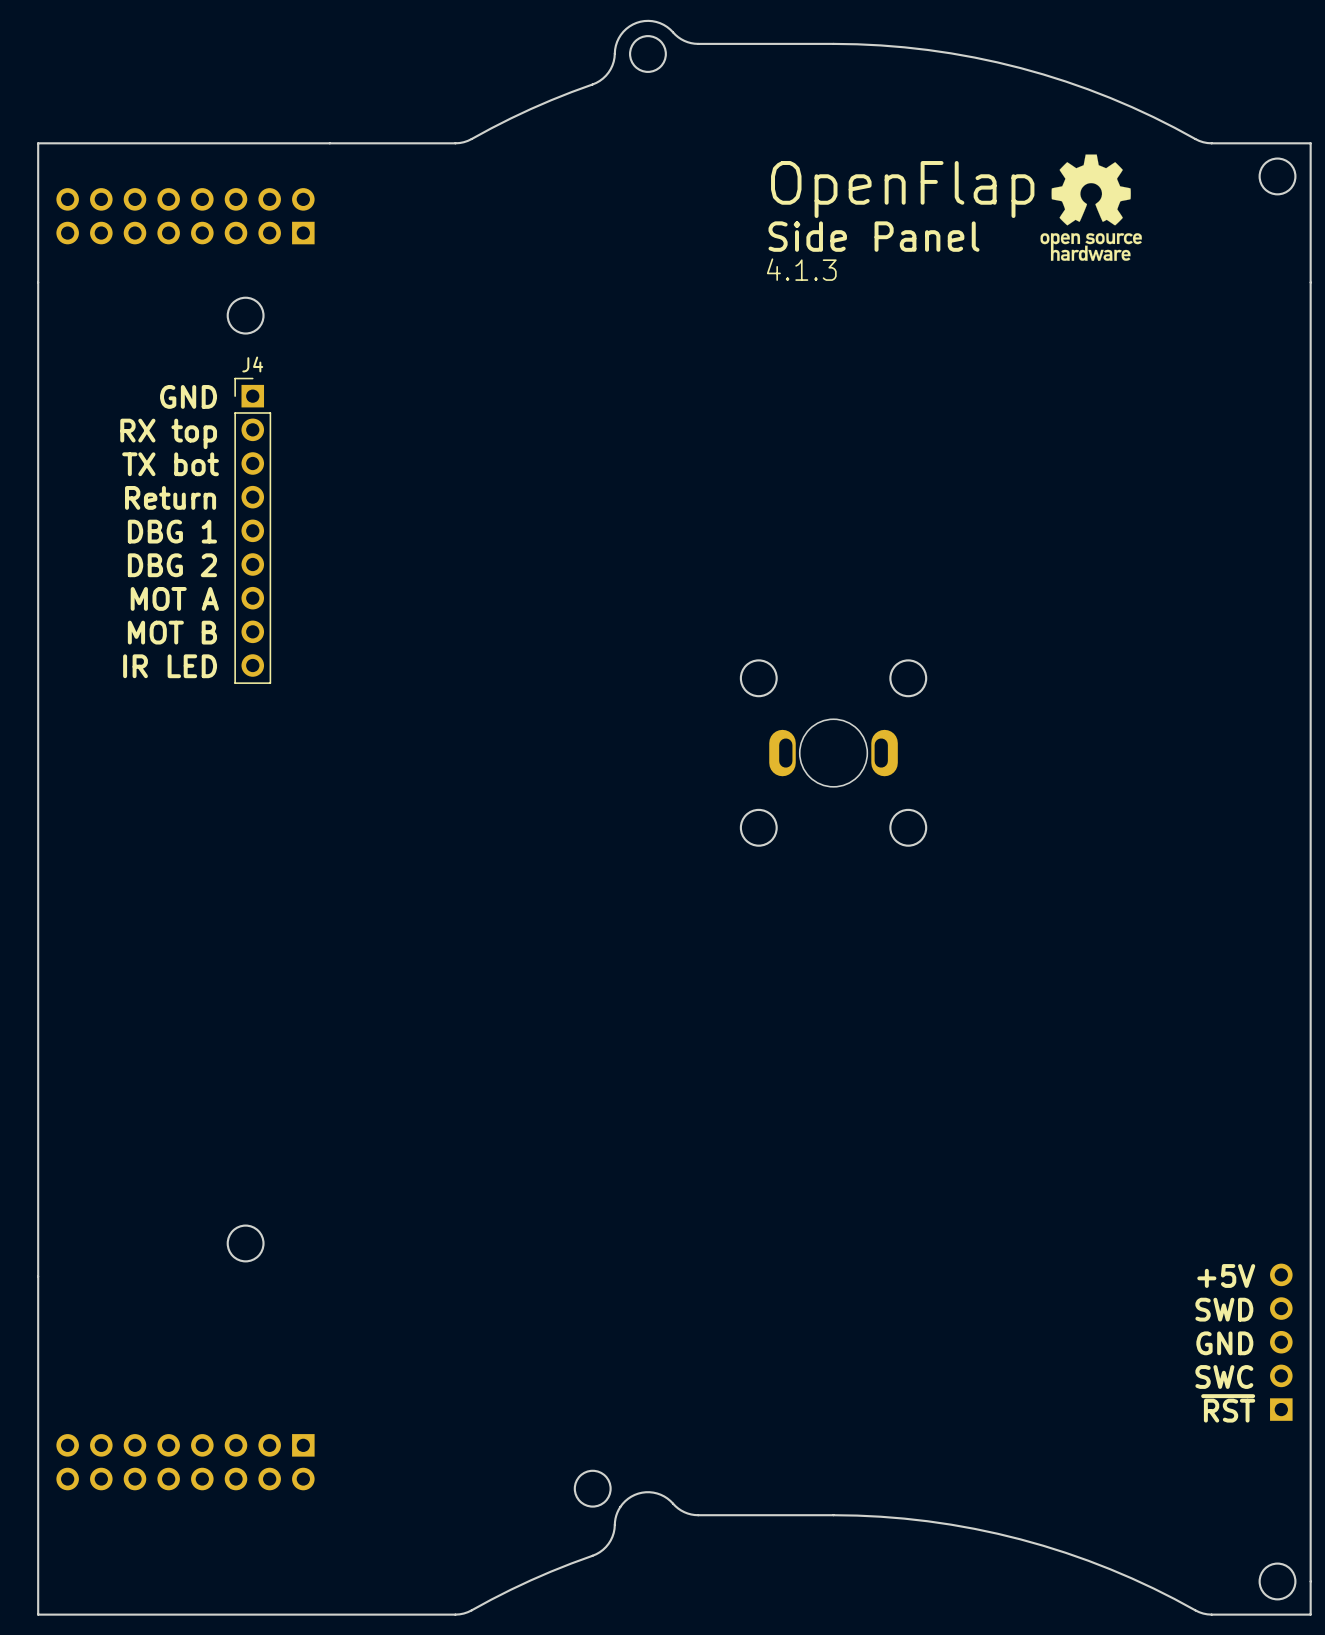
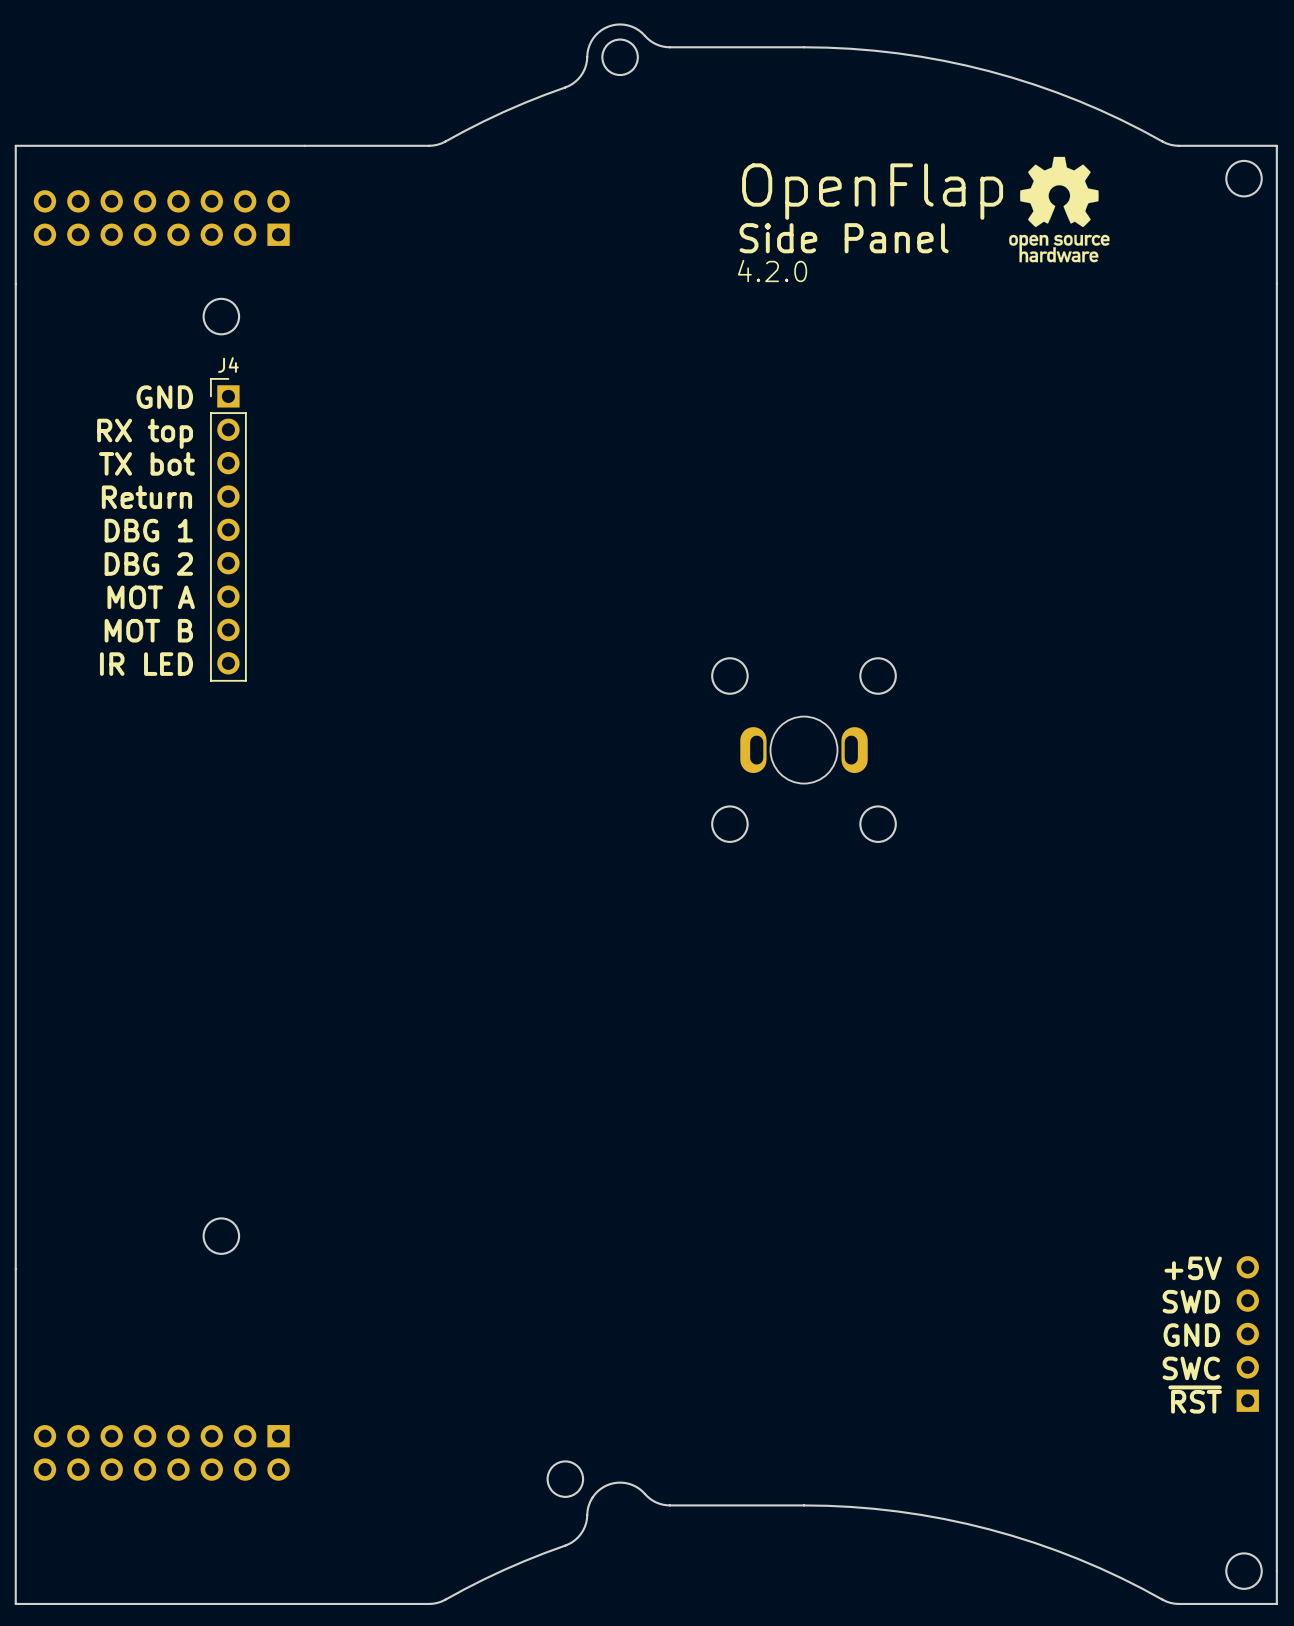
text: 4.1.3 (801, 269) -> 4.2.0 (772, 271)

